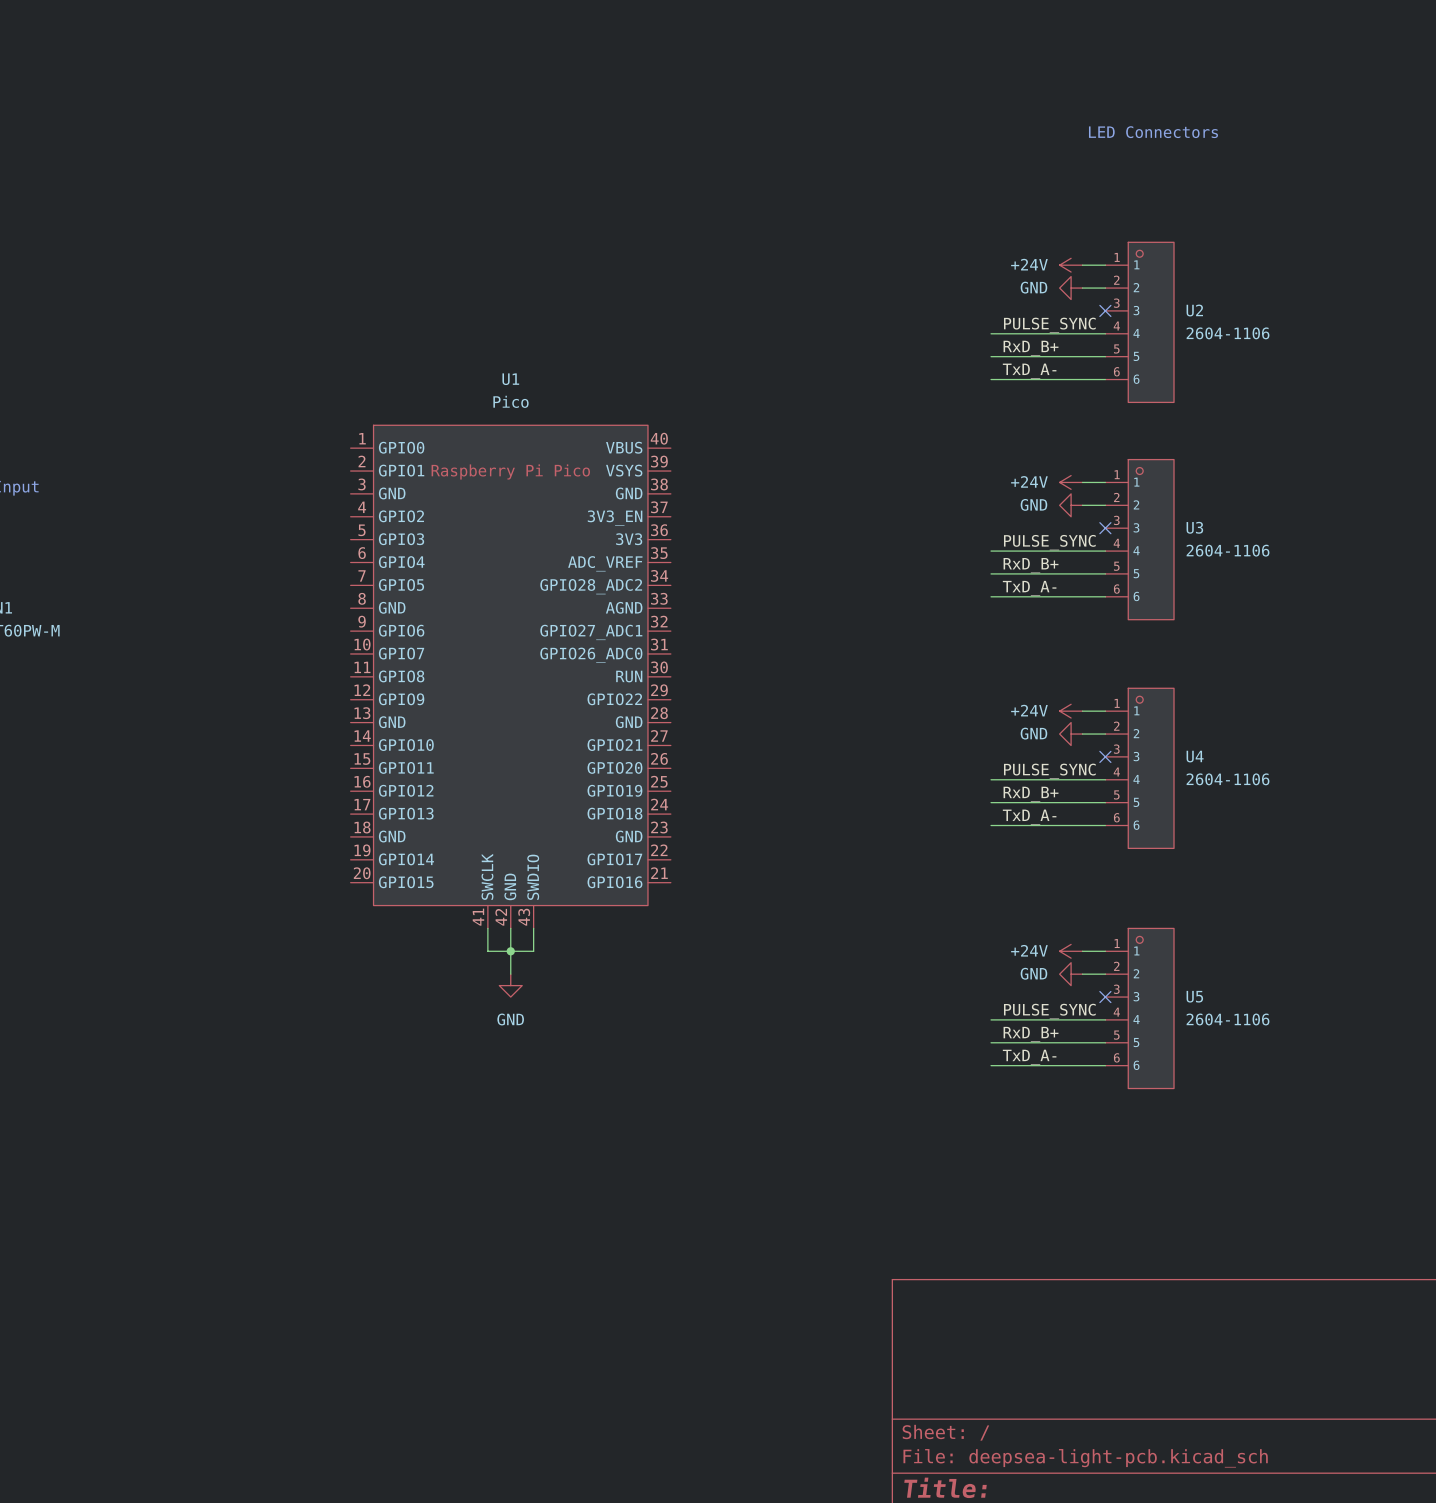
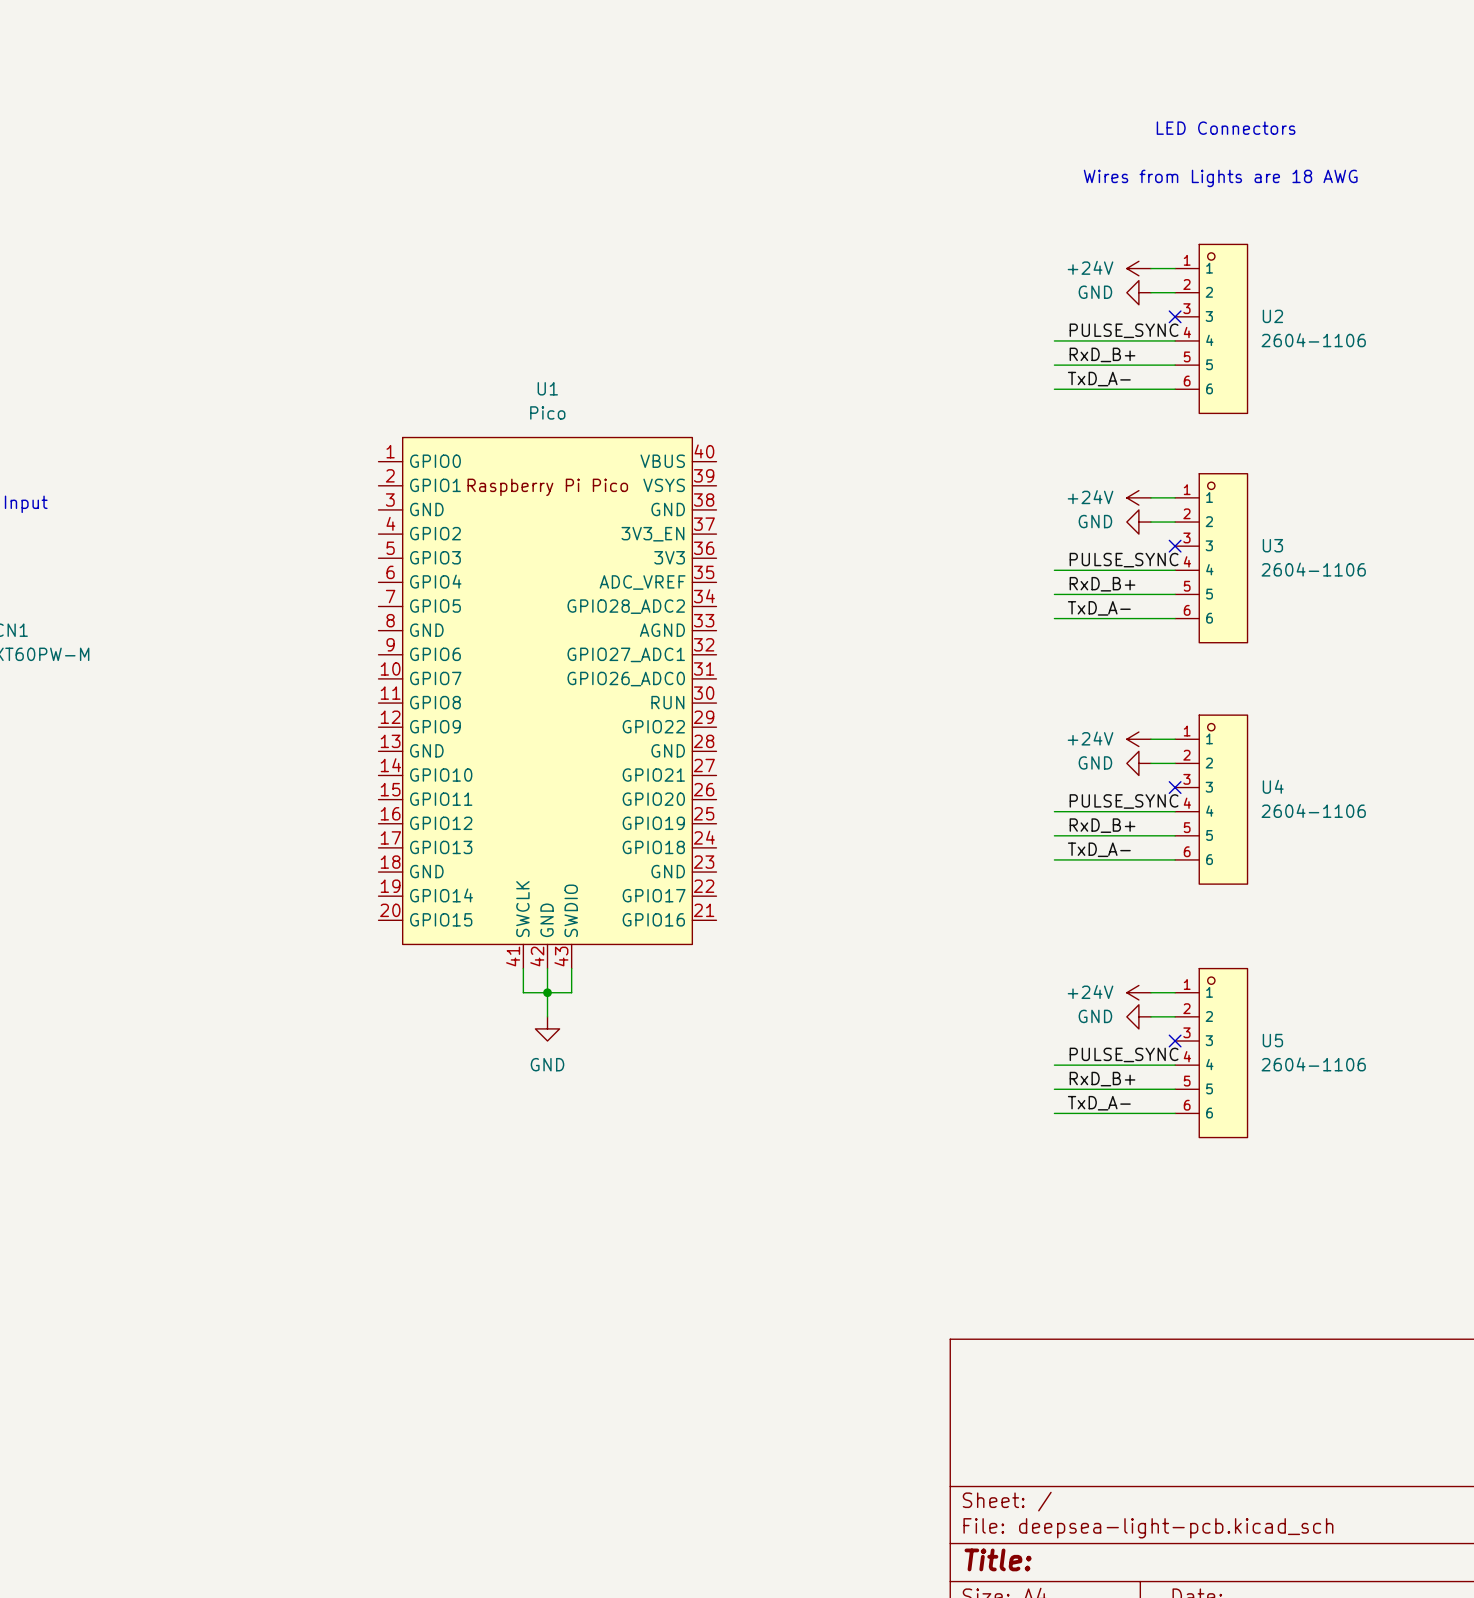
text: none -> Wires from Lights are 18 AWG (1220, 178)

